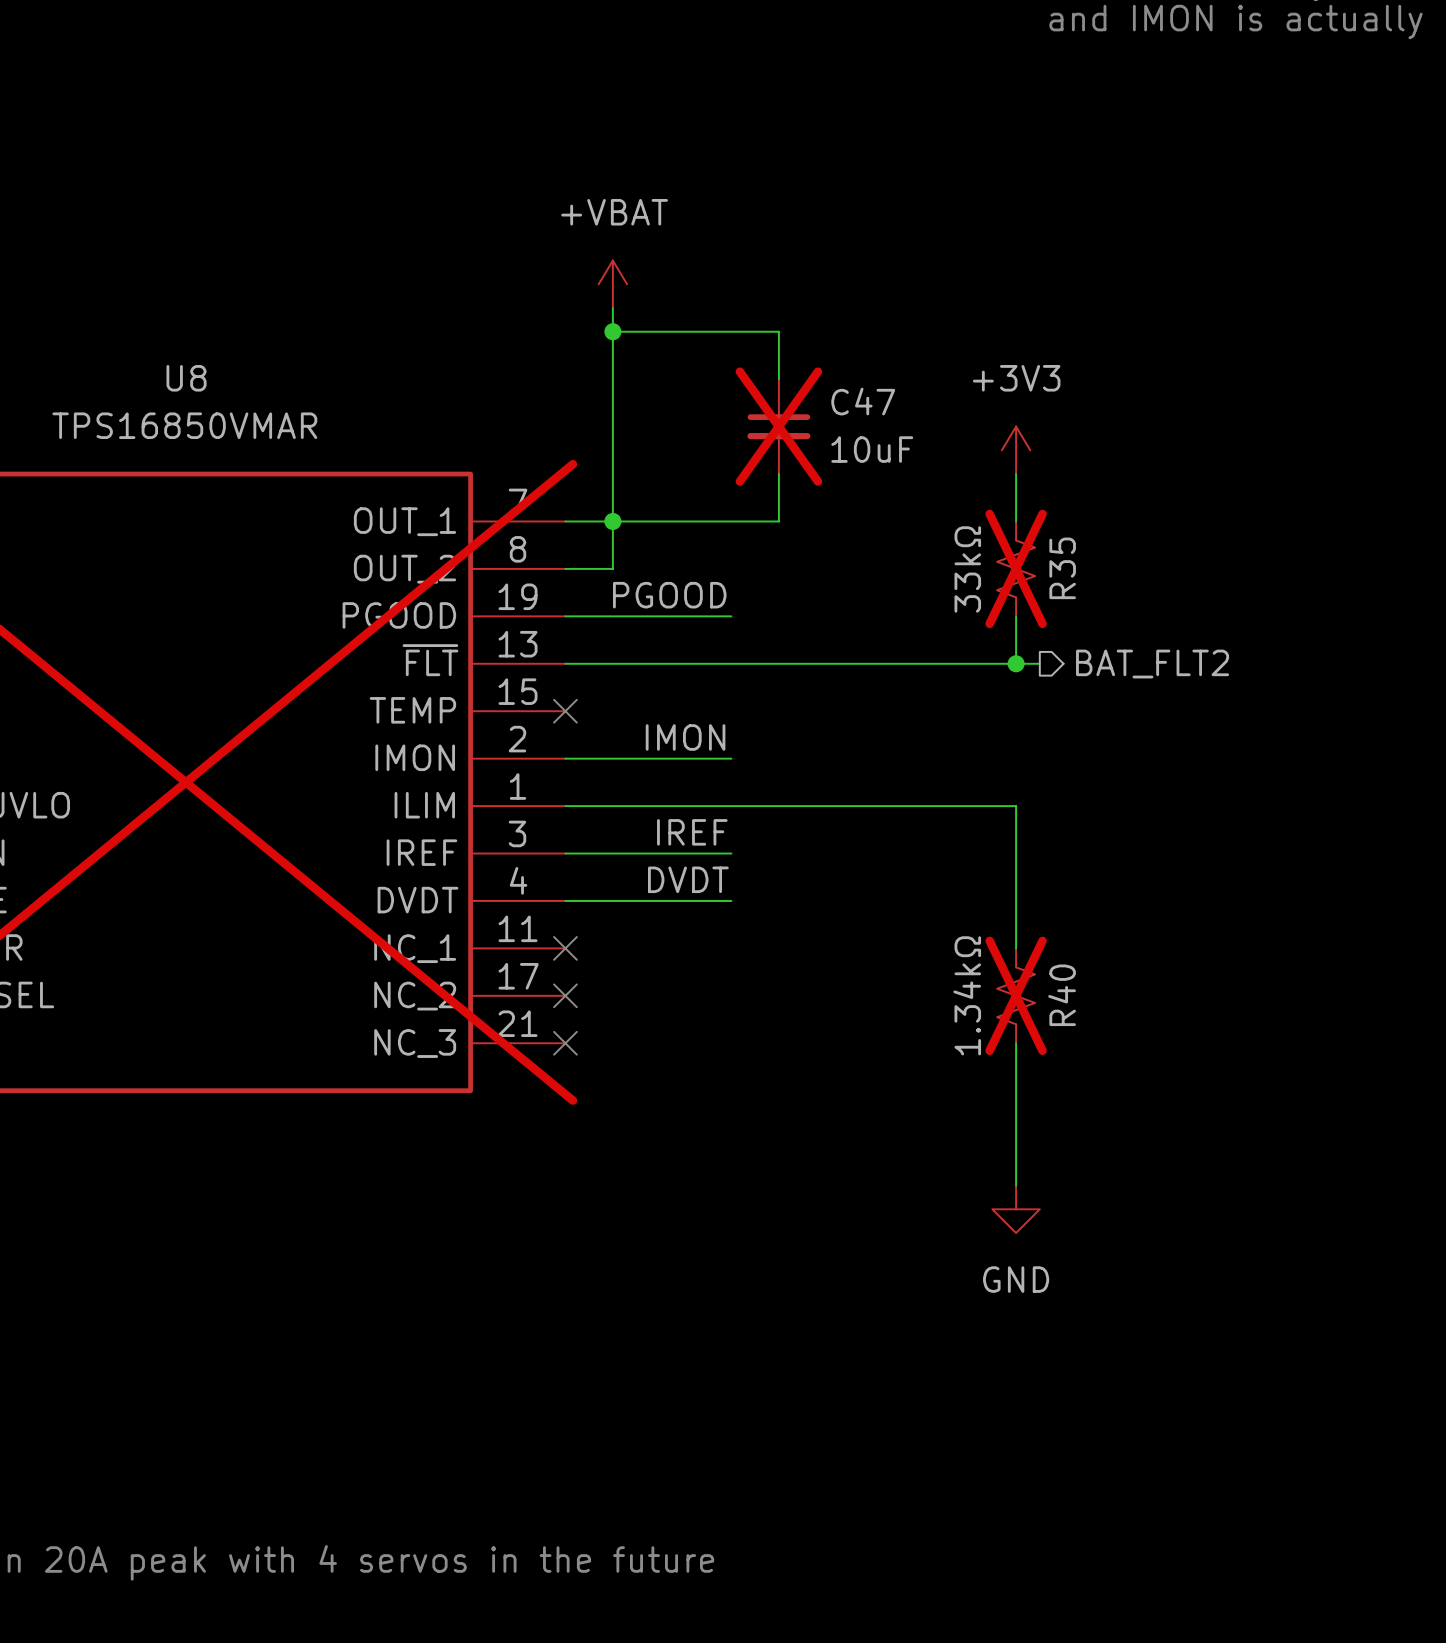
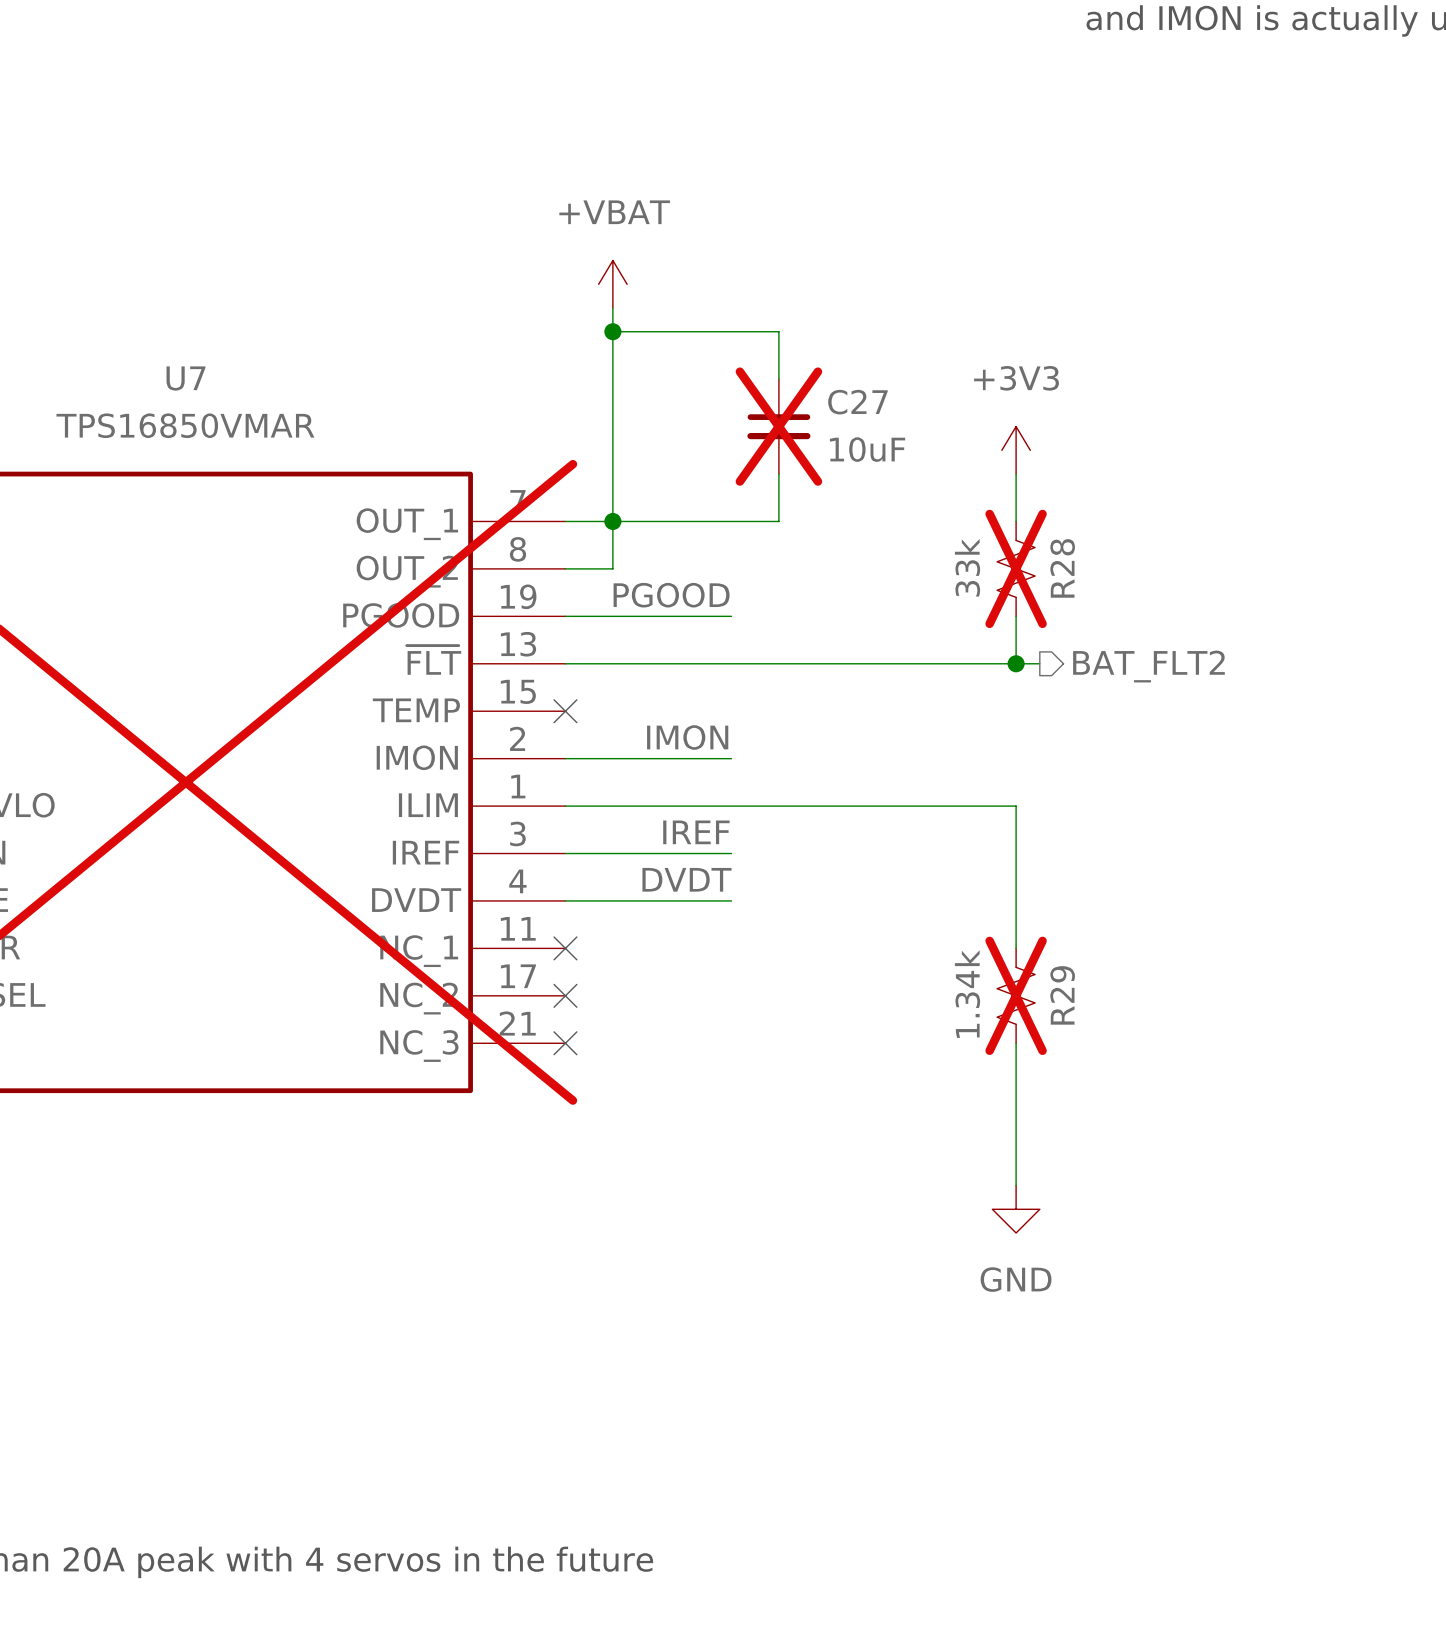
U8 name: U8 (186, 378) -> U7 (185, 378)
C47 name: C47 (863, 401) -> C27 (857, 402)
R35 name: R35 (1062, 568) -> R28 (1062, 568)
R35 value: 33kΩ (967, 569) -> 33k (967, 567)
R40 value: 1.34kΩ (967, 995) -> 1.34k (967, 994)
R40 name: R40 (1062, 995) -> R29 (1062, 995)

